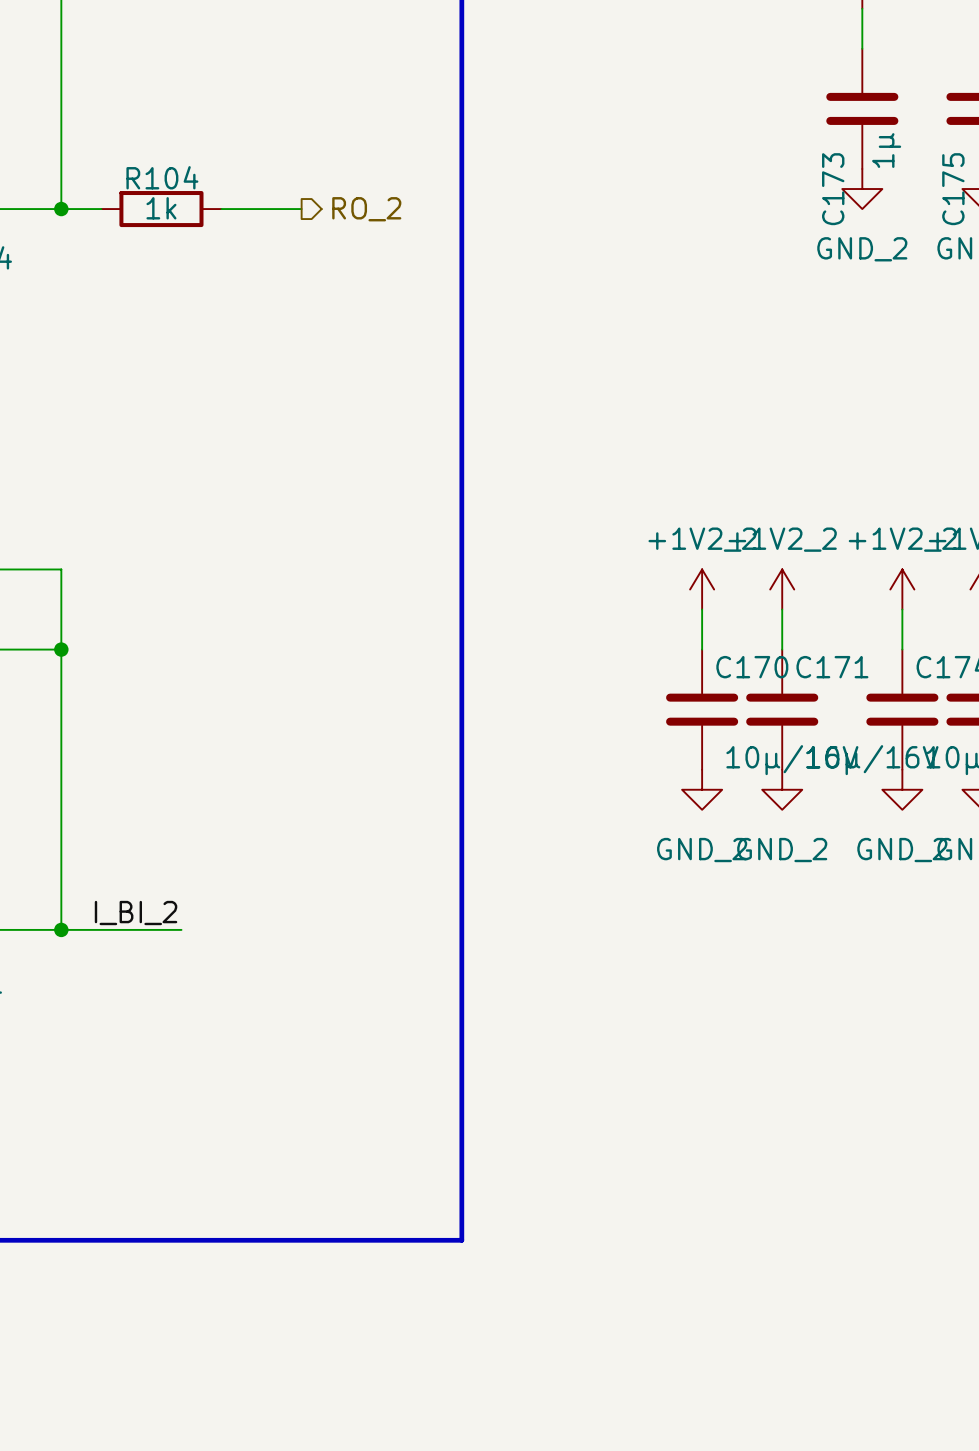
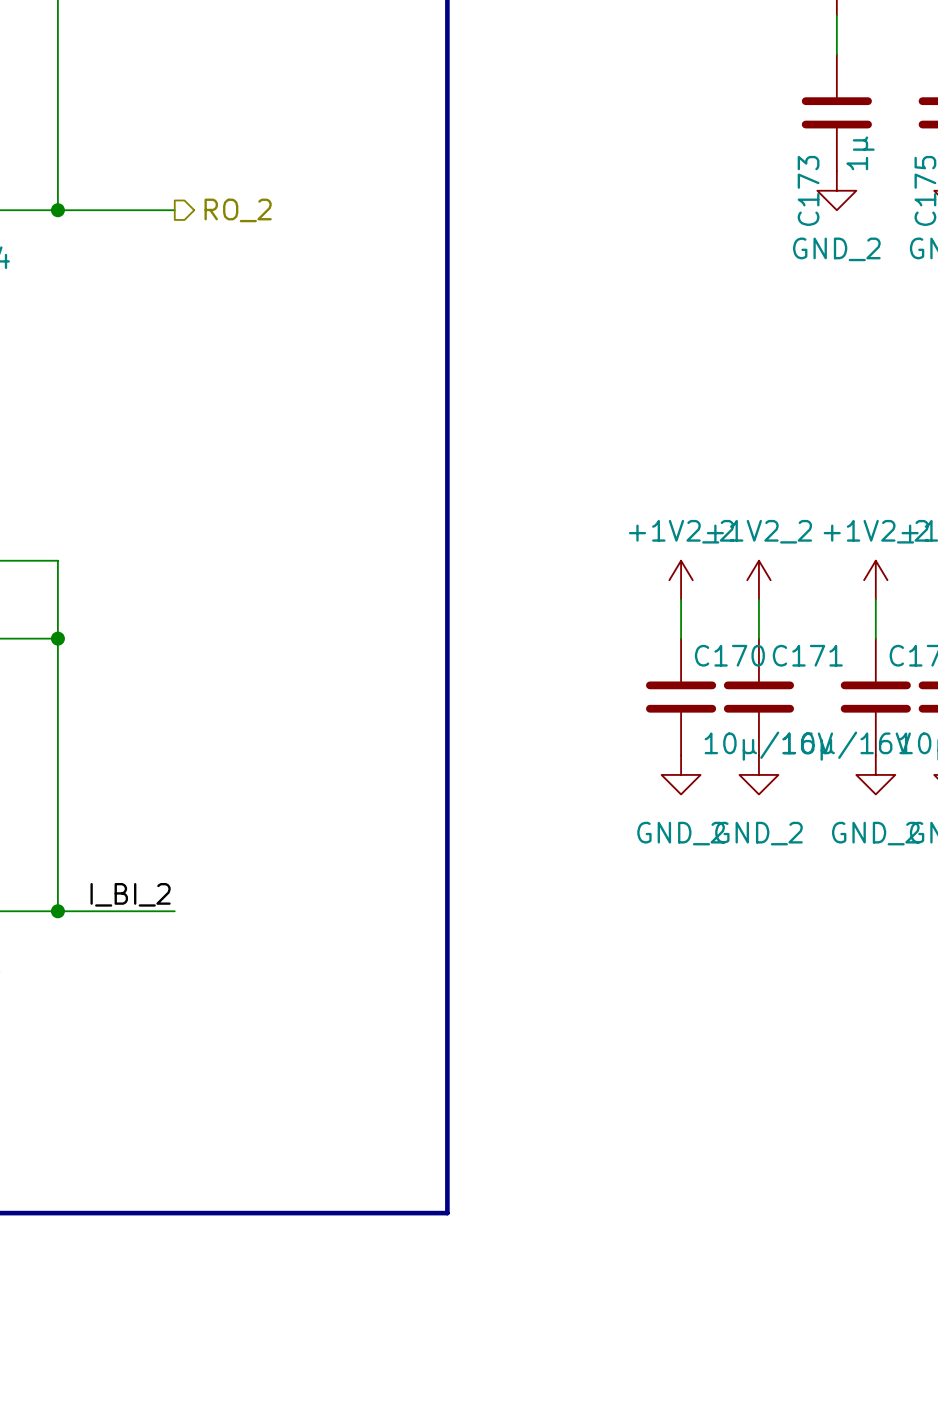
R104: 1k (161, 209) -> none
wire: (221, 209) (301, 209) -> (96, 210) (174, 210)
hierarchical label position: RO_2 (366, 209) -> RO_2 (238, 210)

